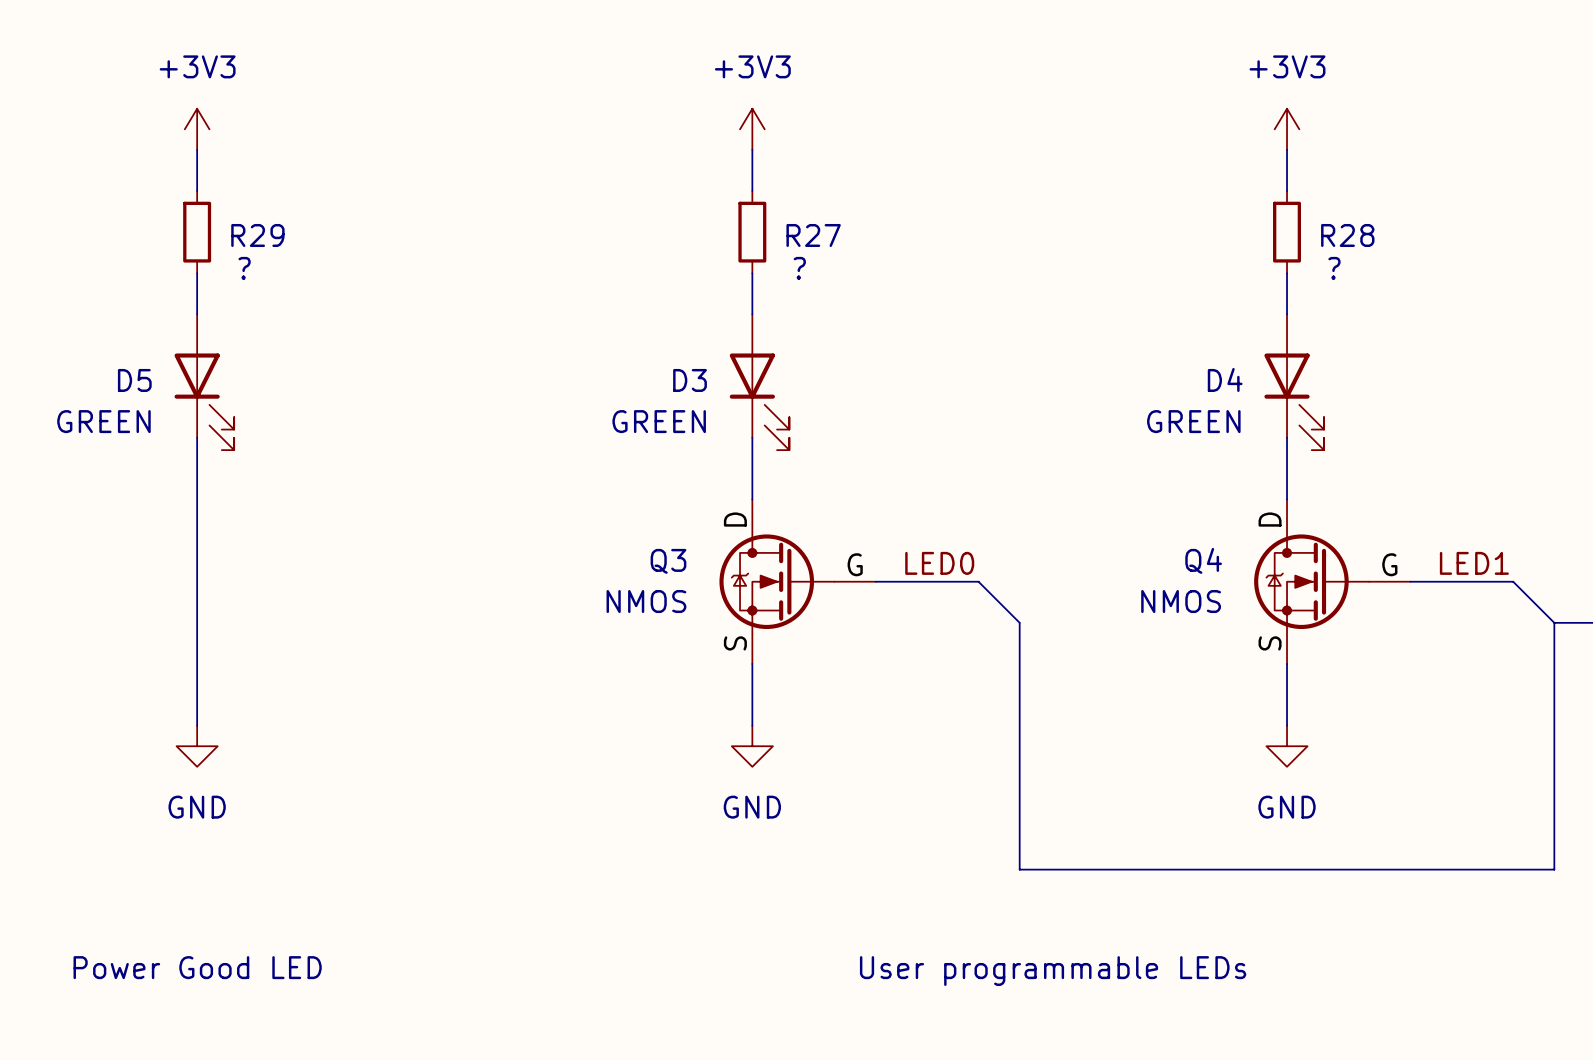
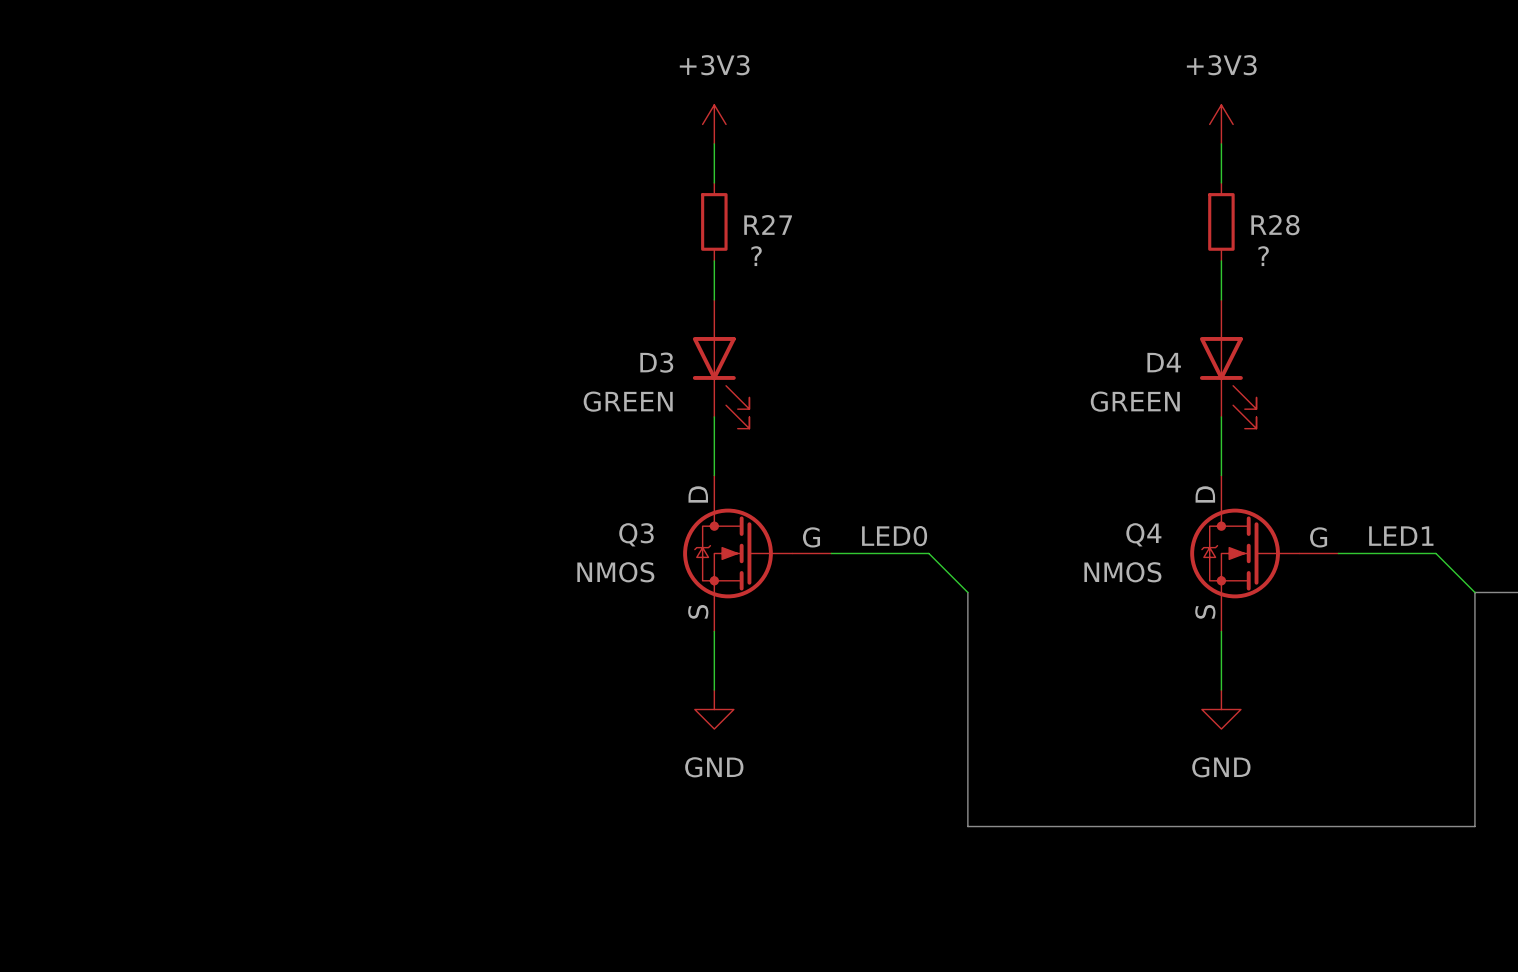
power symbol: +3V3 (197, 129) -> none
wire: (197, 149) (197, 191) -> none
R29: ? (197, 232) -> none
wire: (197, 273) (197, 314) -> none
D5: GREEN (204, 382) -> none
wire: (197, 437) (197, 725) -> none
power symbol: GND (197, 746) -> none
text: Power Good LED (197, 967) -> none
text: User programmable LEDs (1053, 971) -> none

